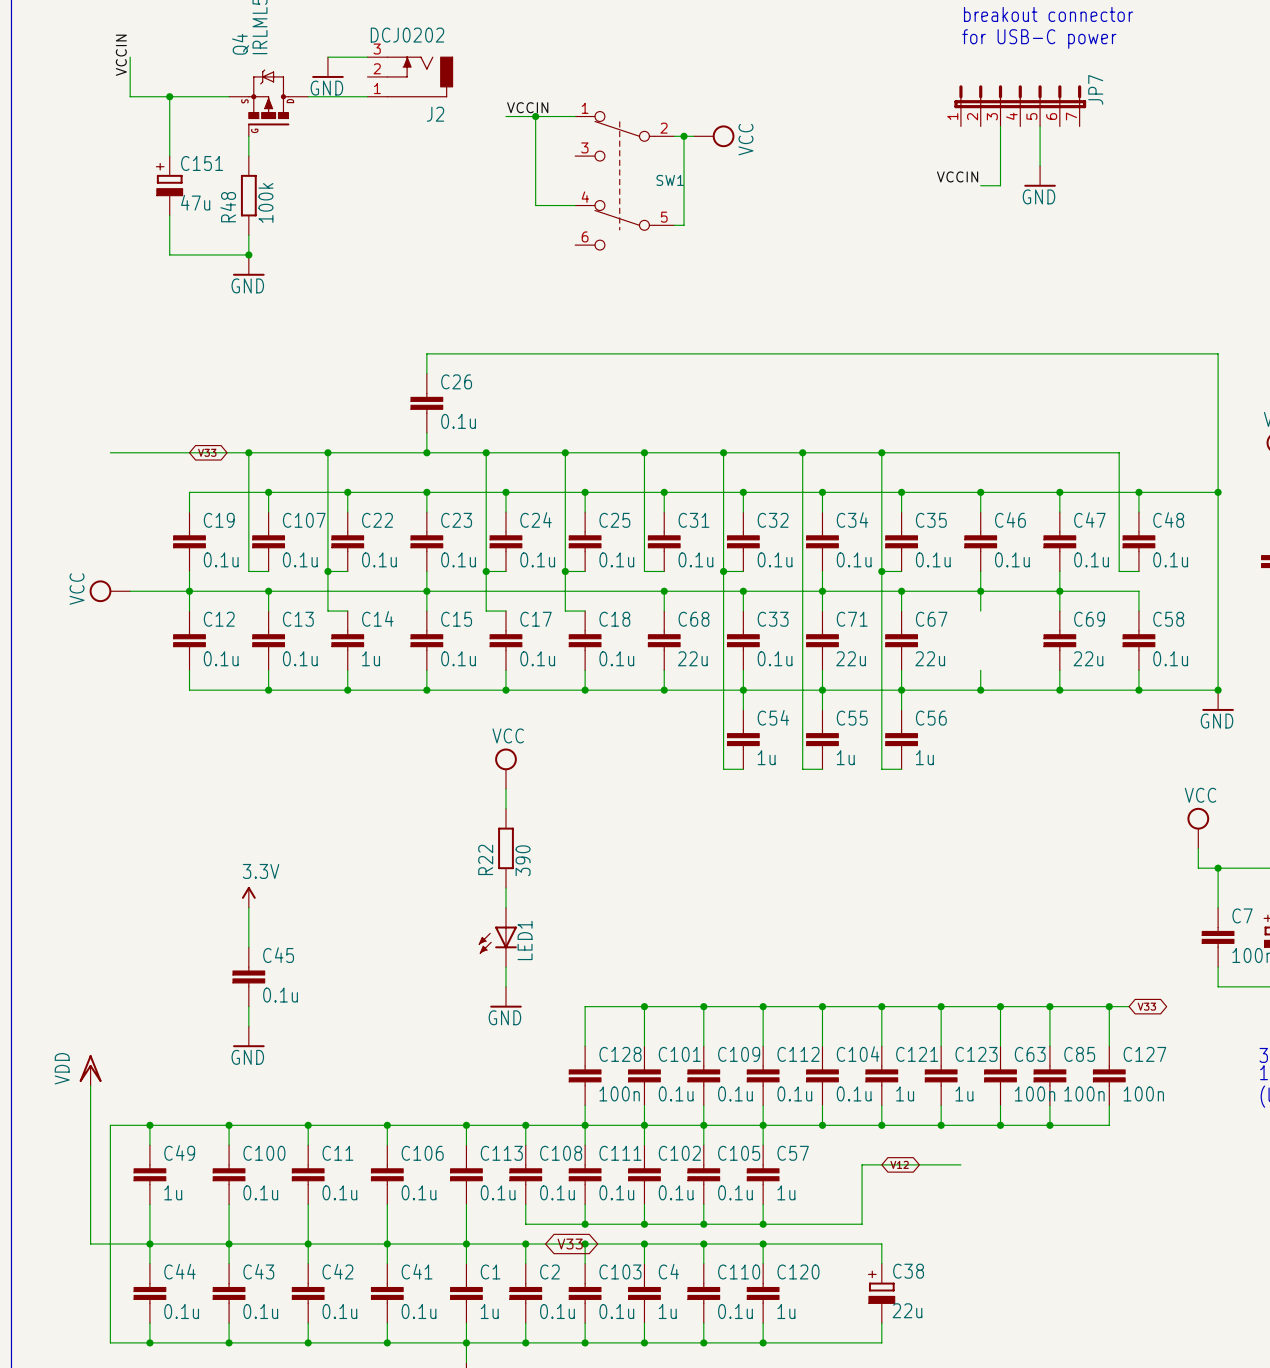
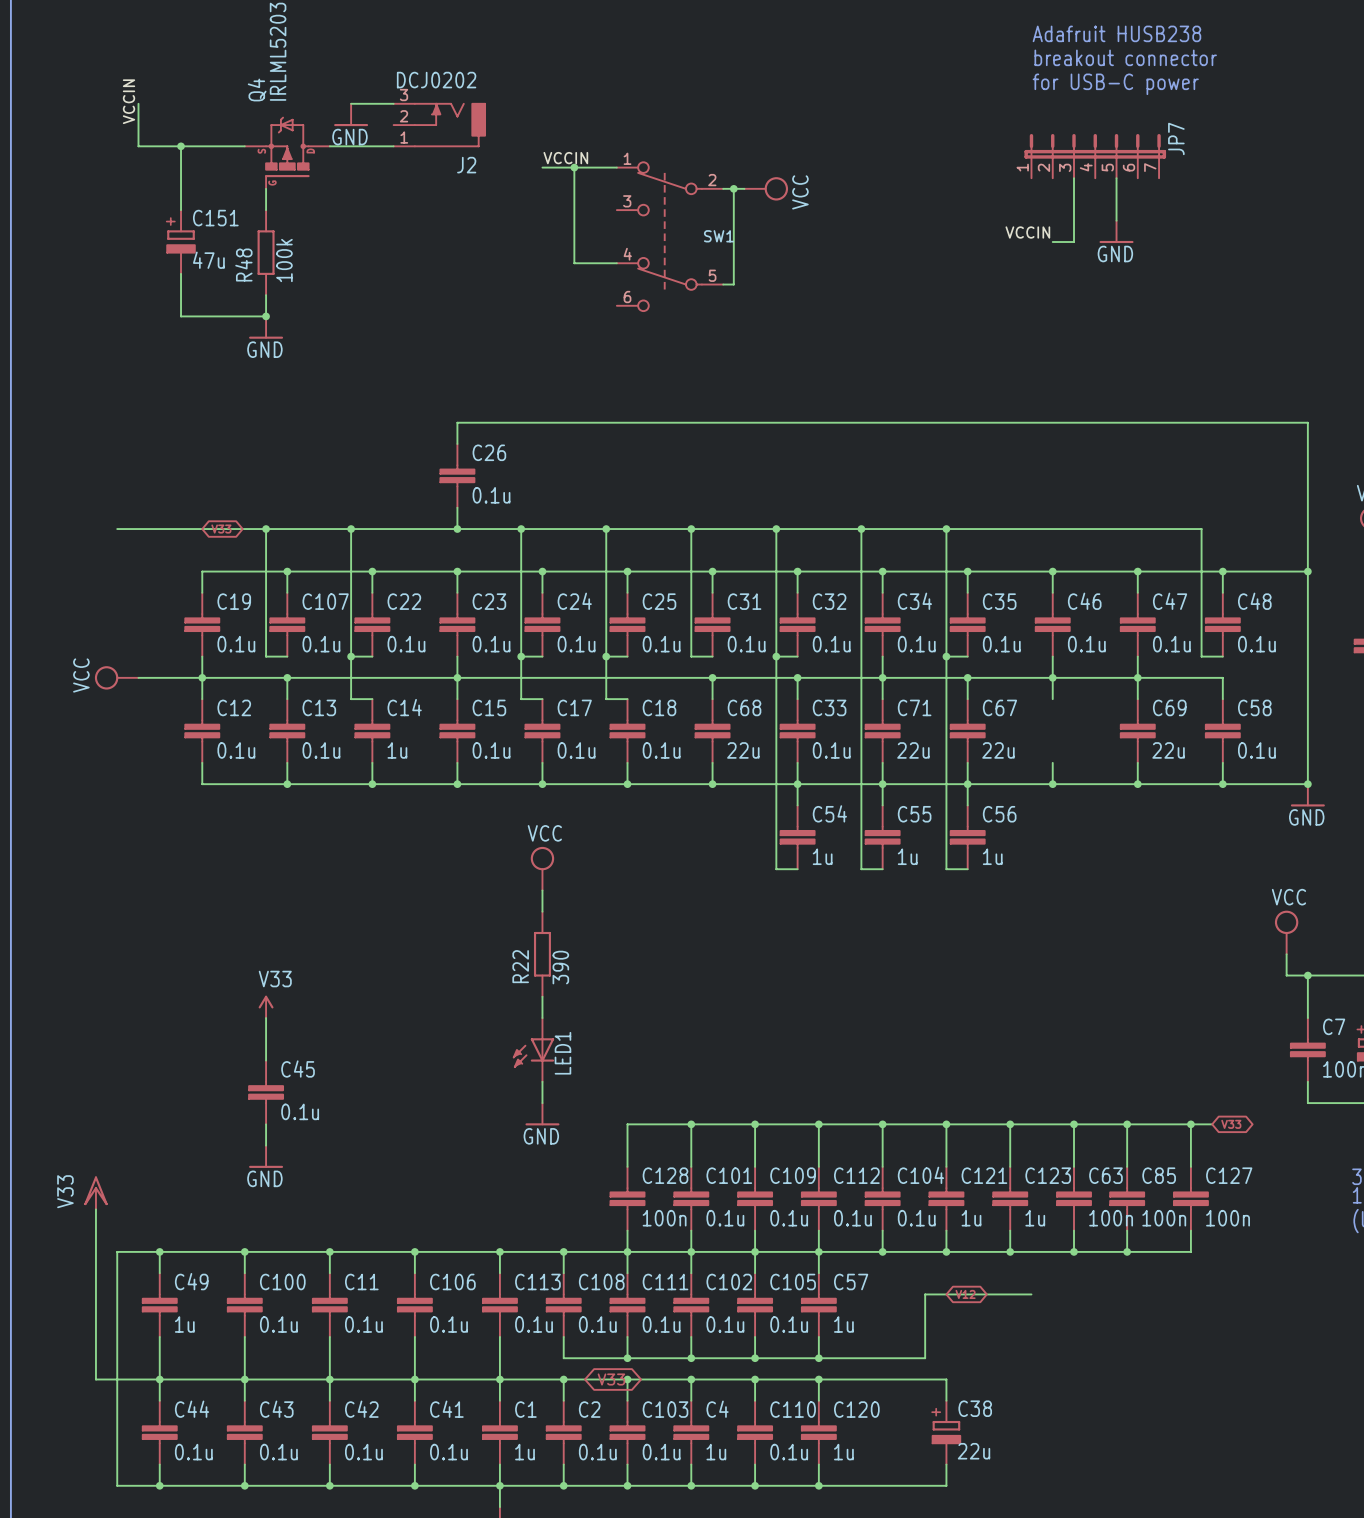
power symbol: 3.3V (248, 897) -> V33 (266, 1006)
power symbol: VDD (90, 1070) -> V33 (95, 1192)

